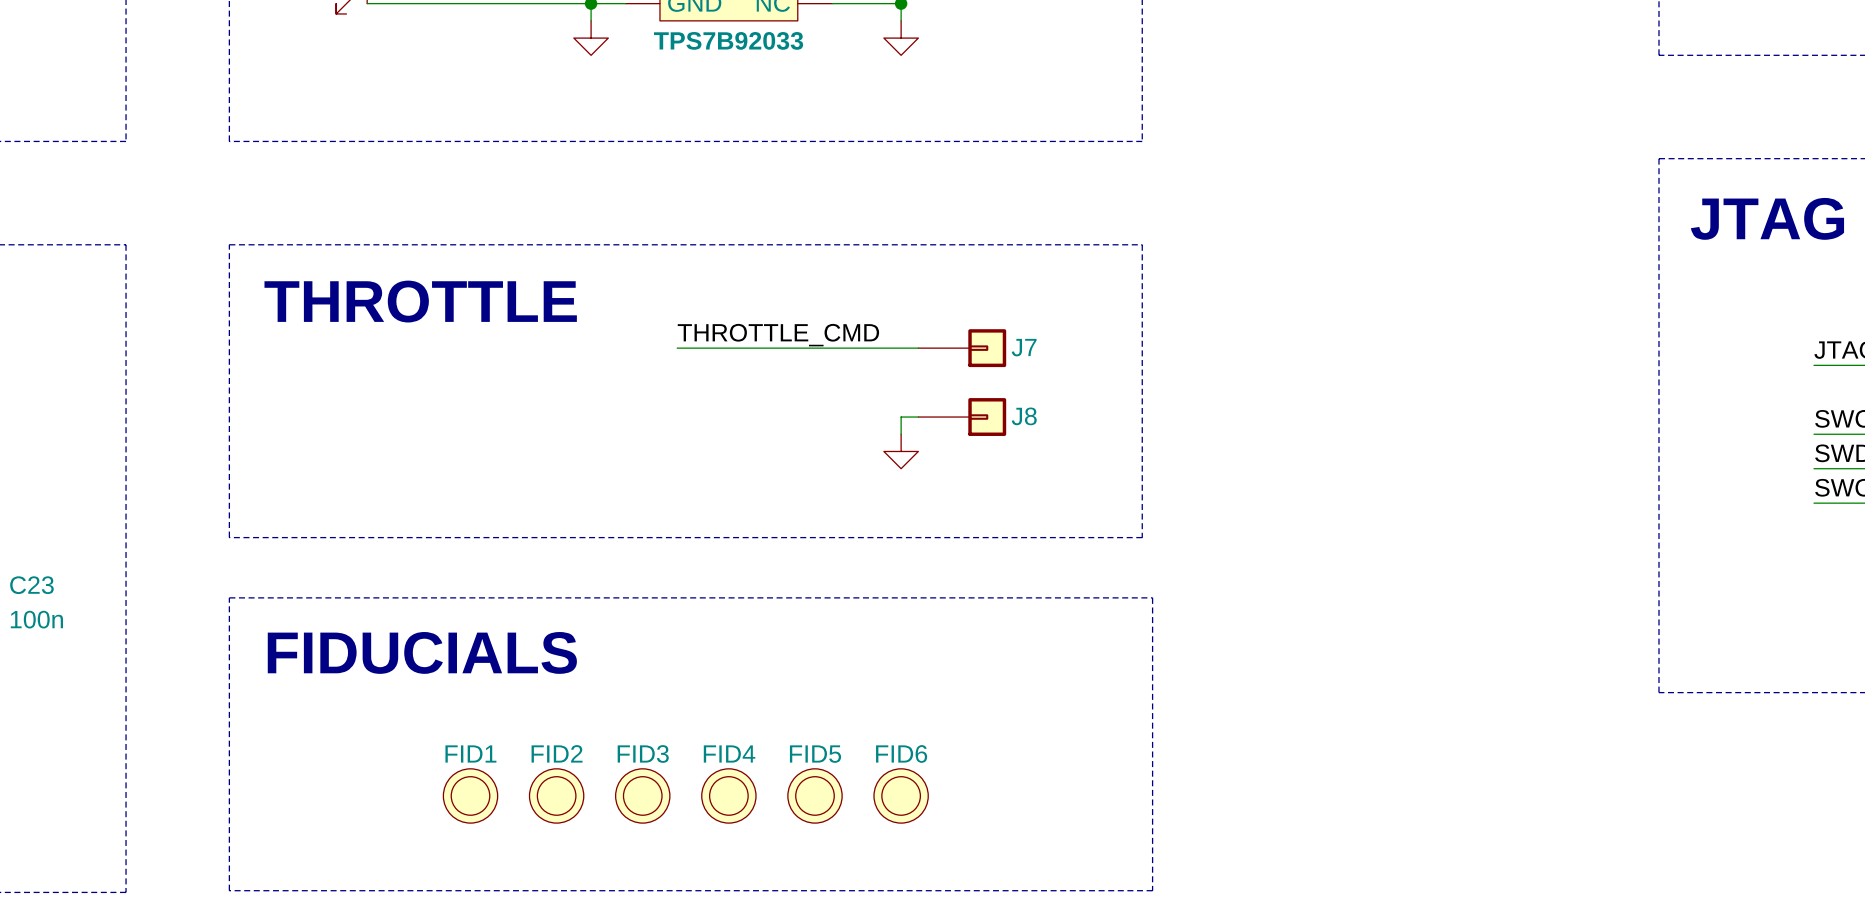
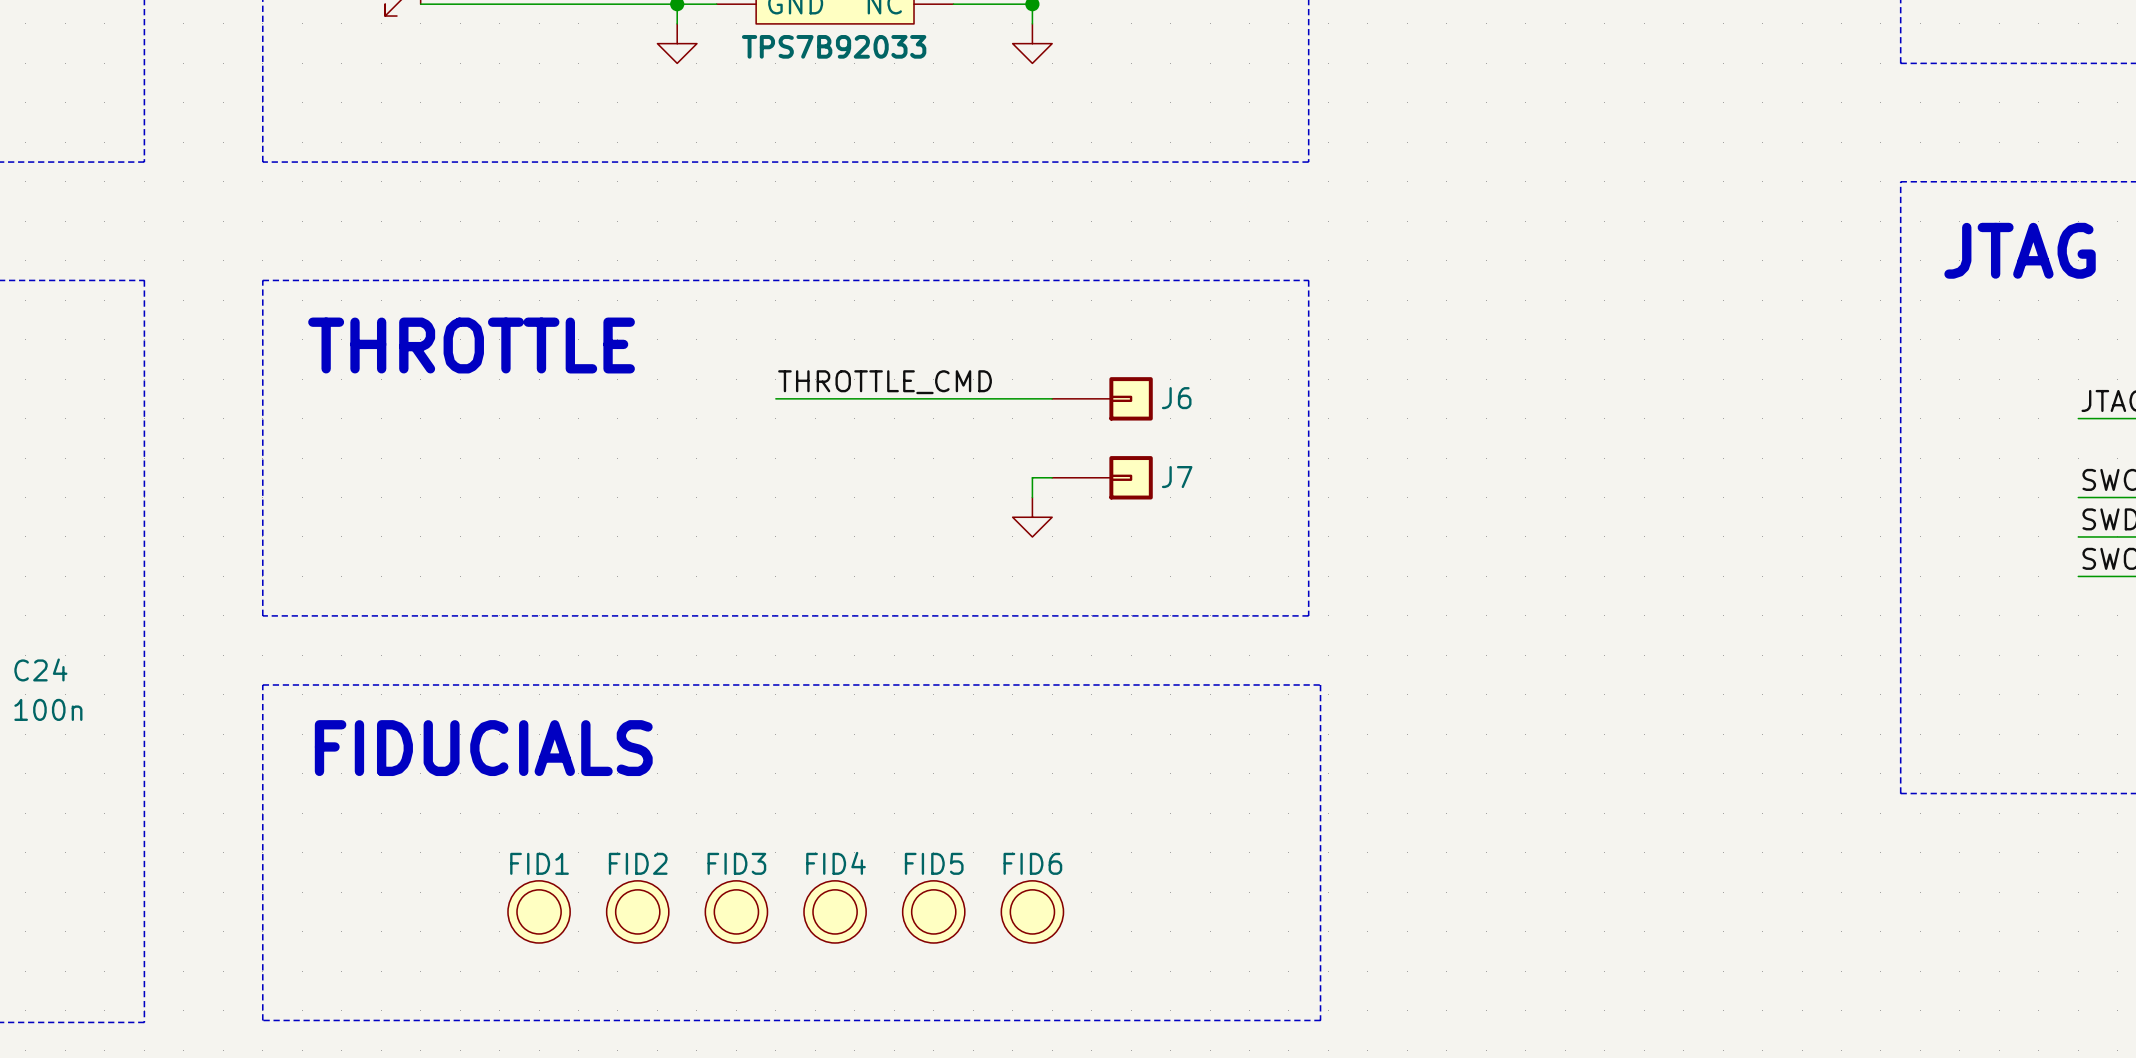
J7 name: J7 (1024, 347) -> J6 (1176, 398)
J8 name: J8 (1024, 416) -> J7 (1177, 477)
C23 name: C23 (31, 585) -> C24 (40, 669)

